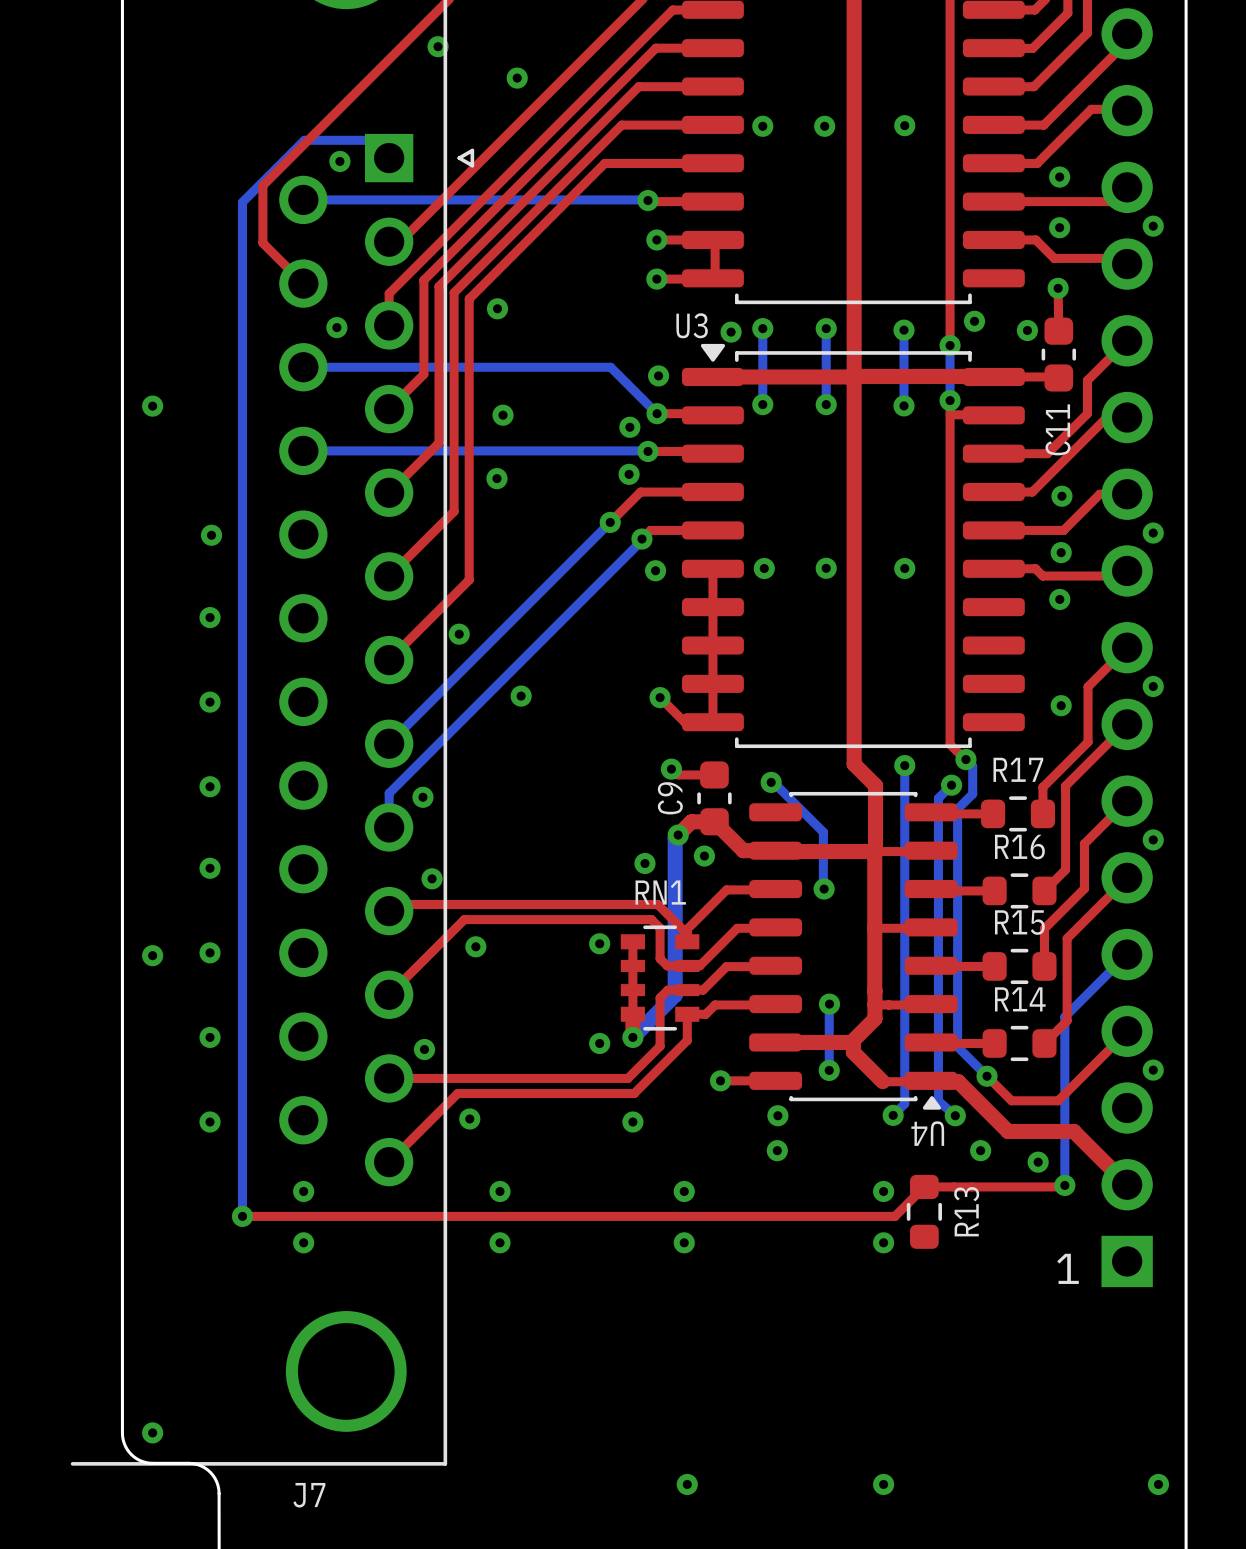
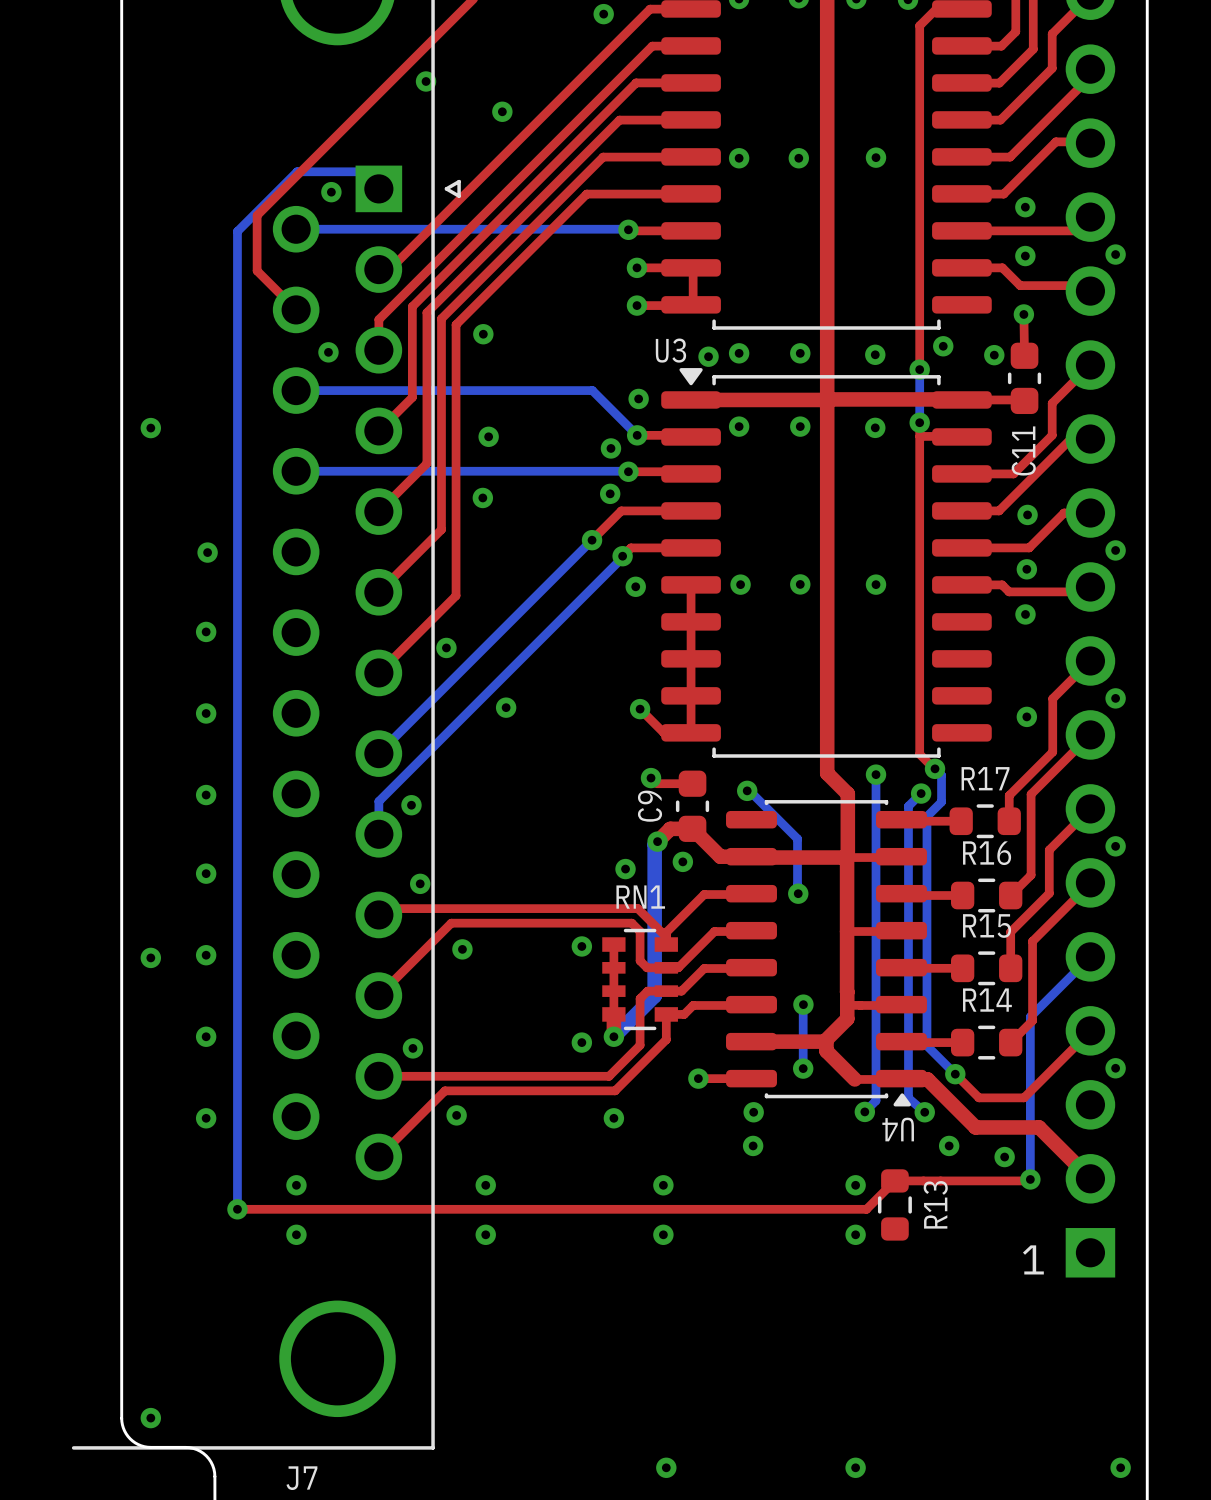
bottom track: (762, 328) (762, 404) -> none
bottom track: (826, 328) (826, 404) -> none
bottom track: (904, 330) (904, 405) -> none

